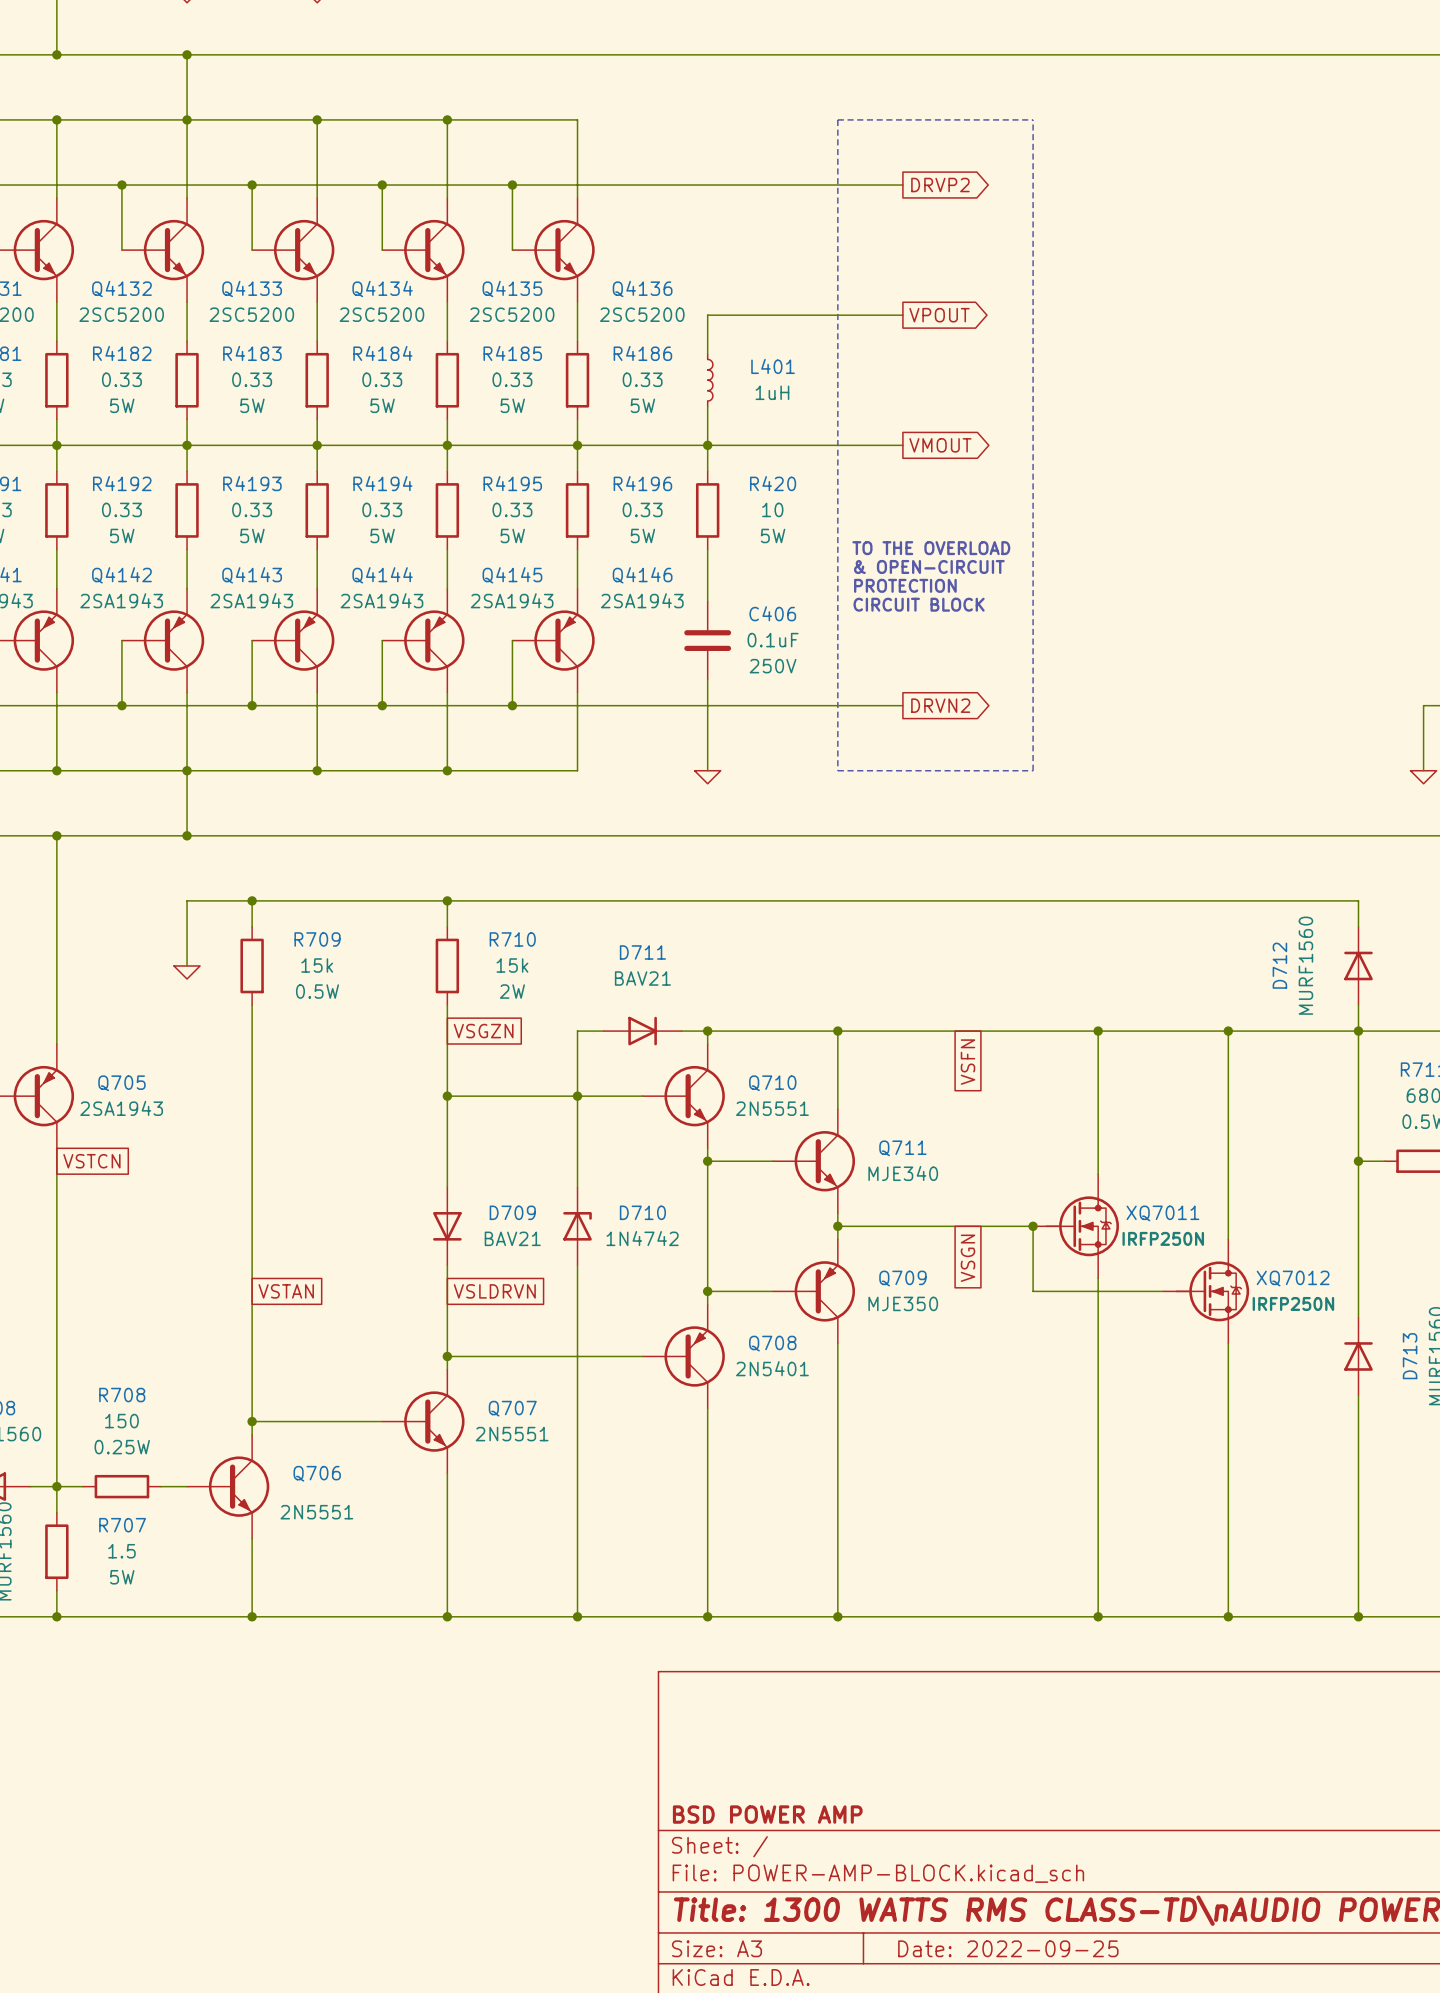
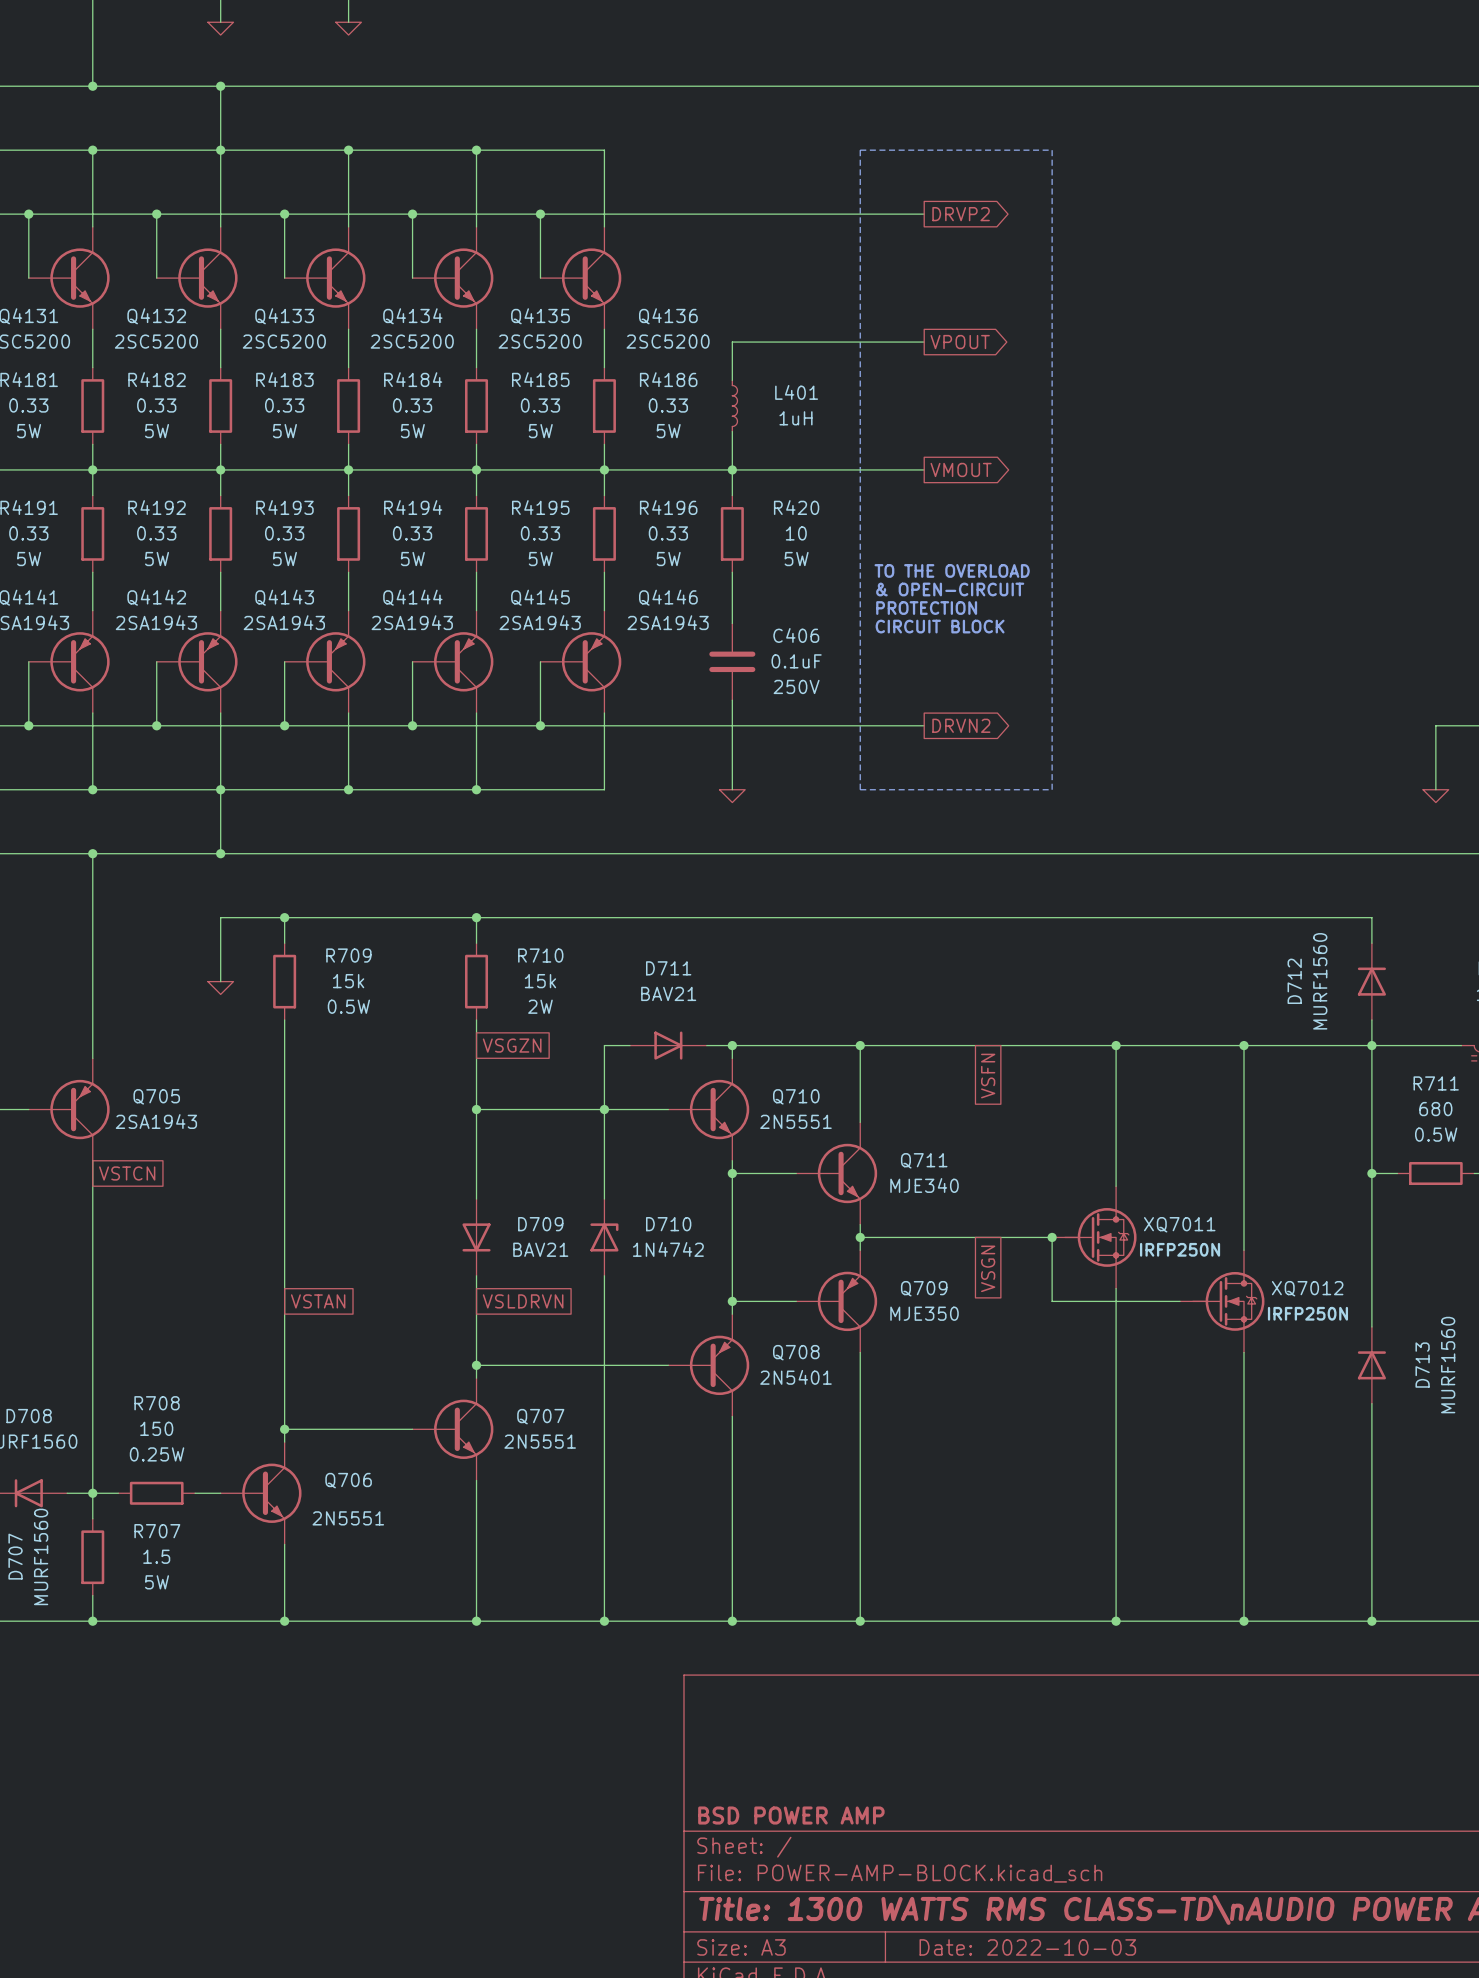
title block: Date: 2022-09-25 (1008, 1948) -> Date: 2022-10-03 (1027, 1947)

